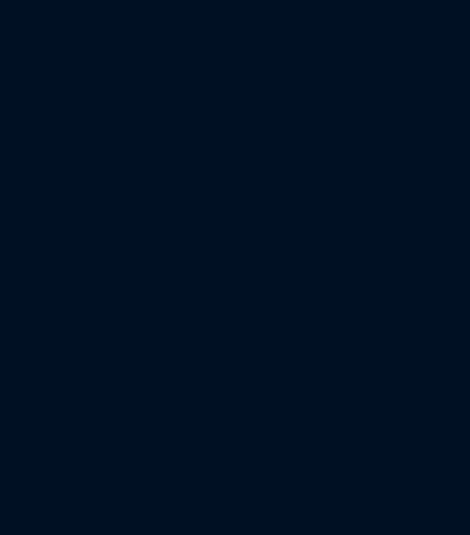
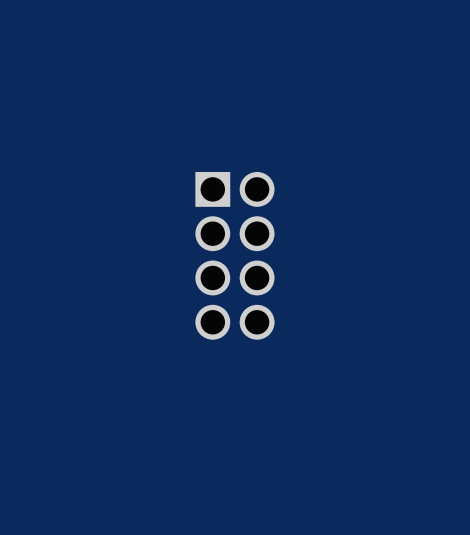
part: none -> (234, 255)

